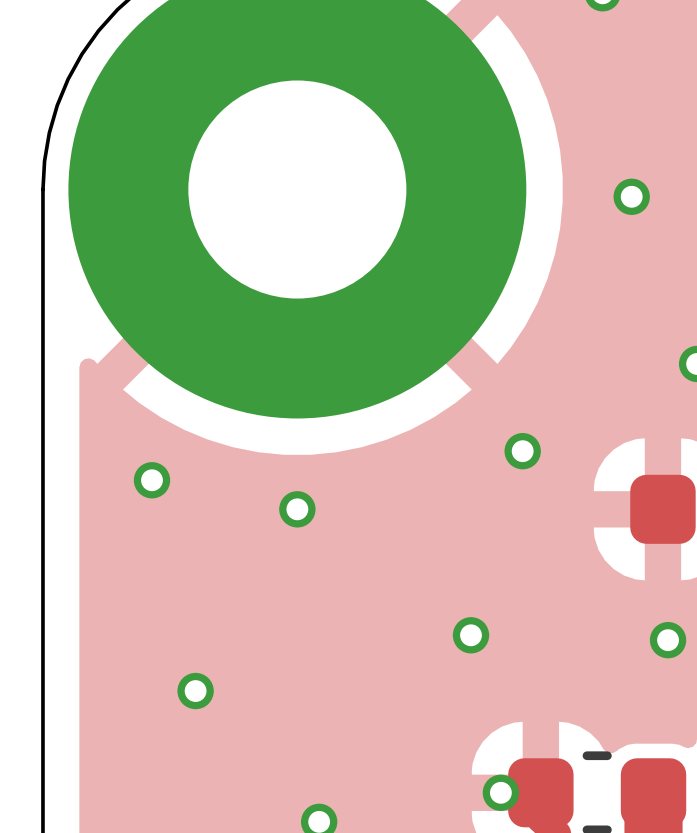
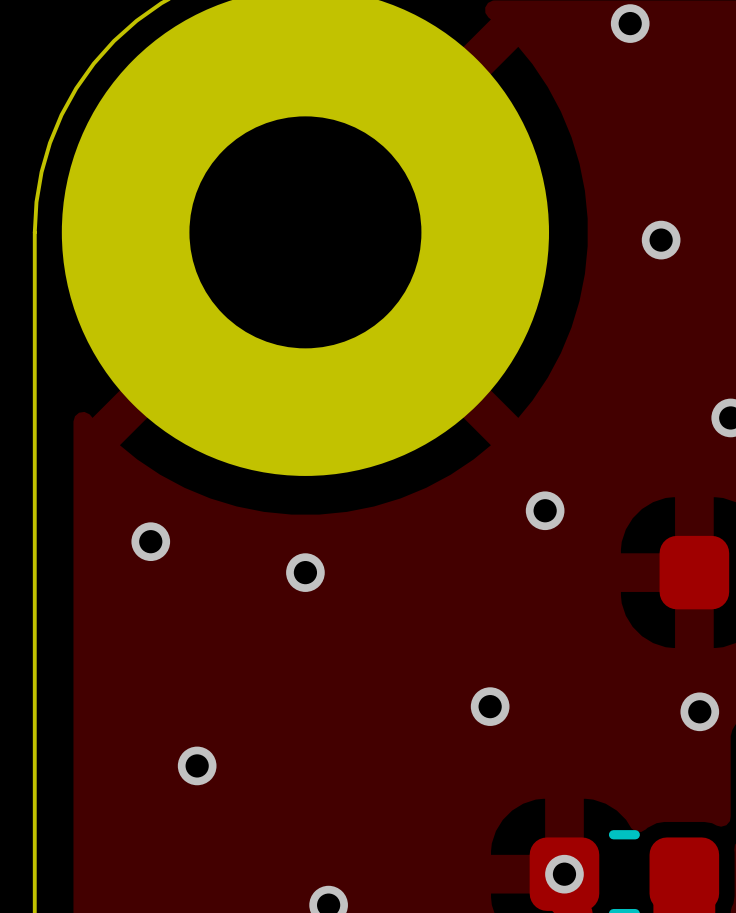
via position: (500, 792) -> (564, 874)

